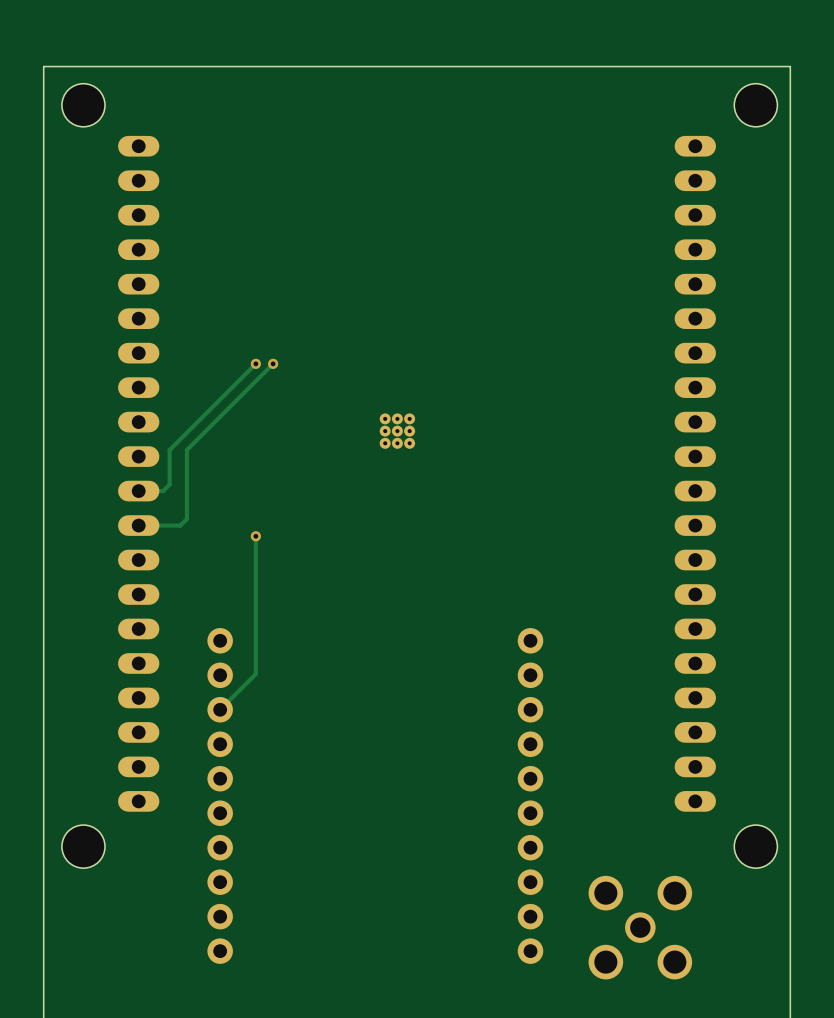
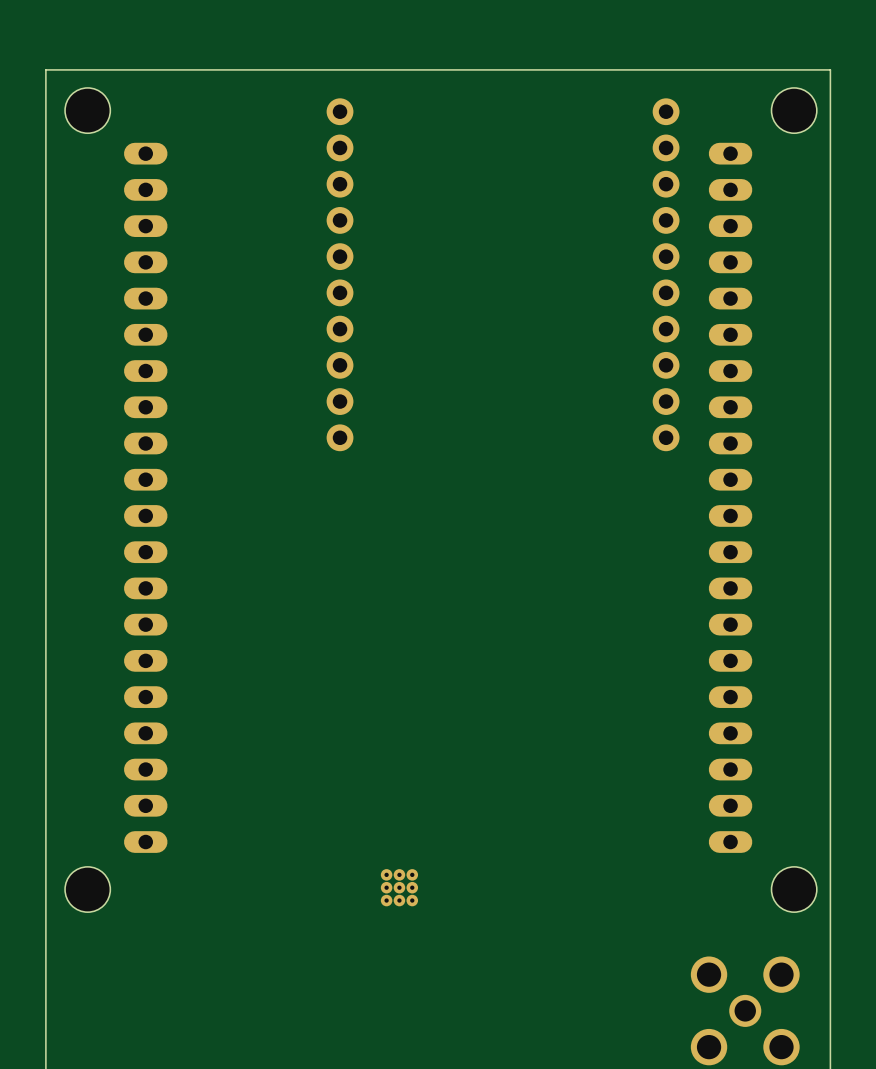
part: none -> (340, 274)
part: none -> (666, 274)
track: (255, 363) (169, 450) (169, 484) (163, 491) (138, 491) -> none
via: (255, 363) -> none
track: (273, 363) (186, 450) (186, 519) (180, 525) (138, 525) -> none
via: (273, 363) -> none
part: (397, 431) -> none
track: (255, 536) (255, 674) (220, 709) -> none
via: (255, 536) -> none
part: (220, 795) -> none
part: (530, 795) -> none
part: none -> (399, 887)
part position: (640, 927) -> (745, 1010)

